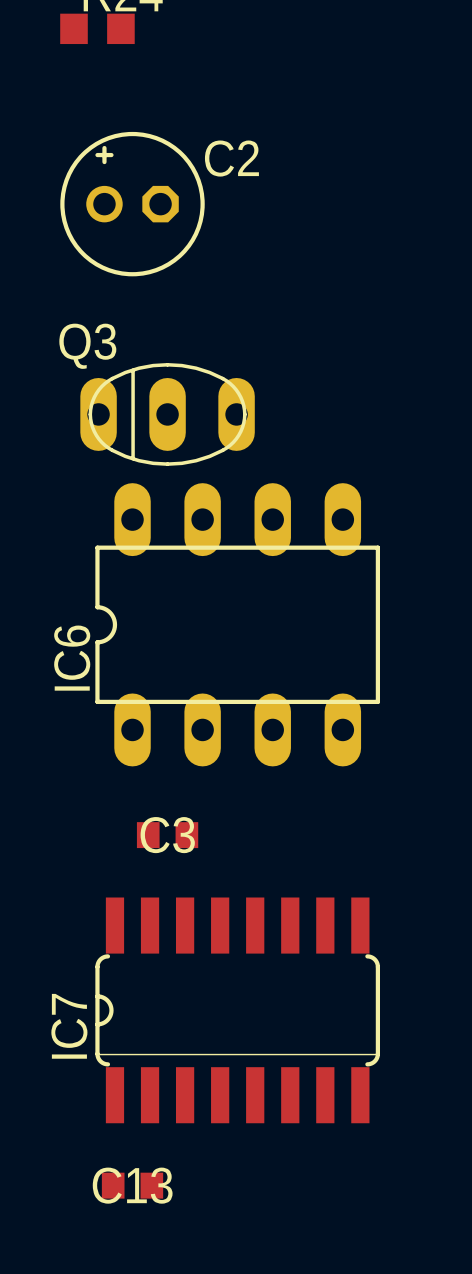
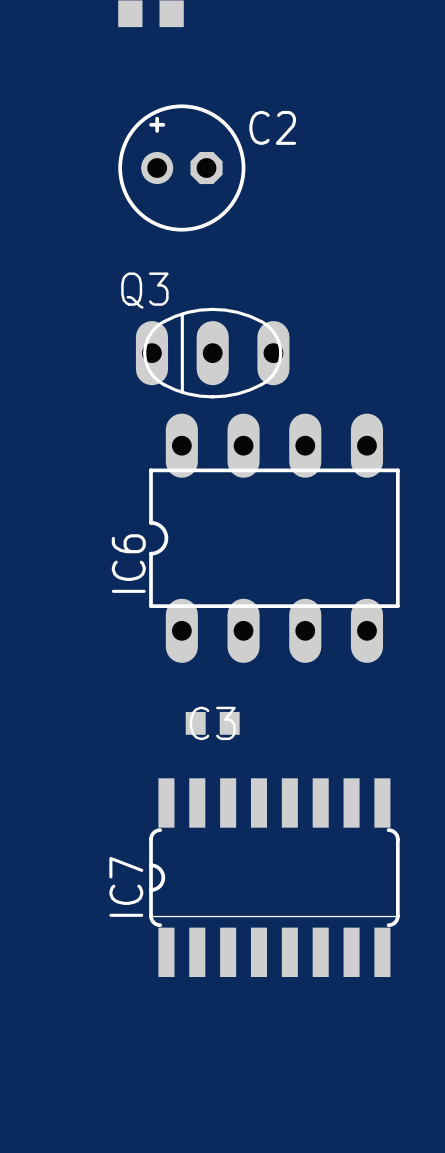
C13: (132, 1185) -> none

